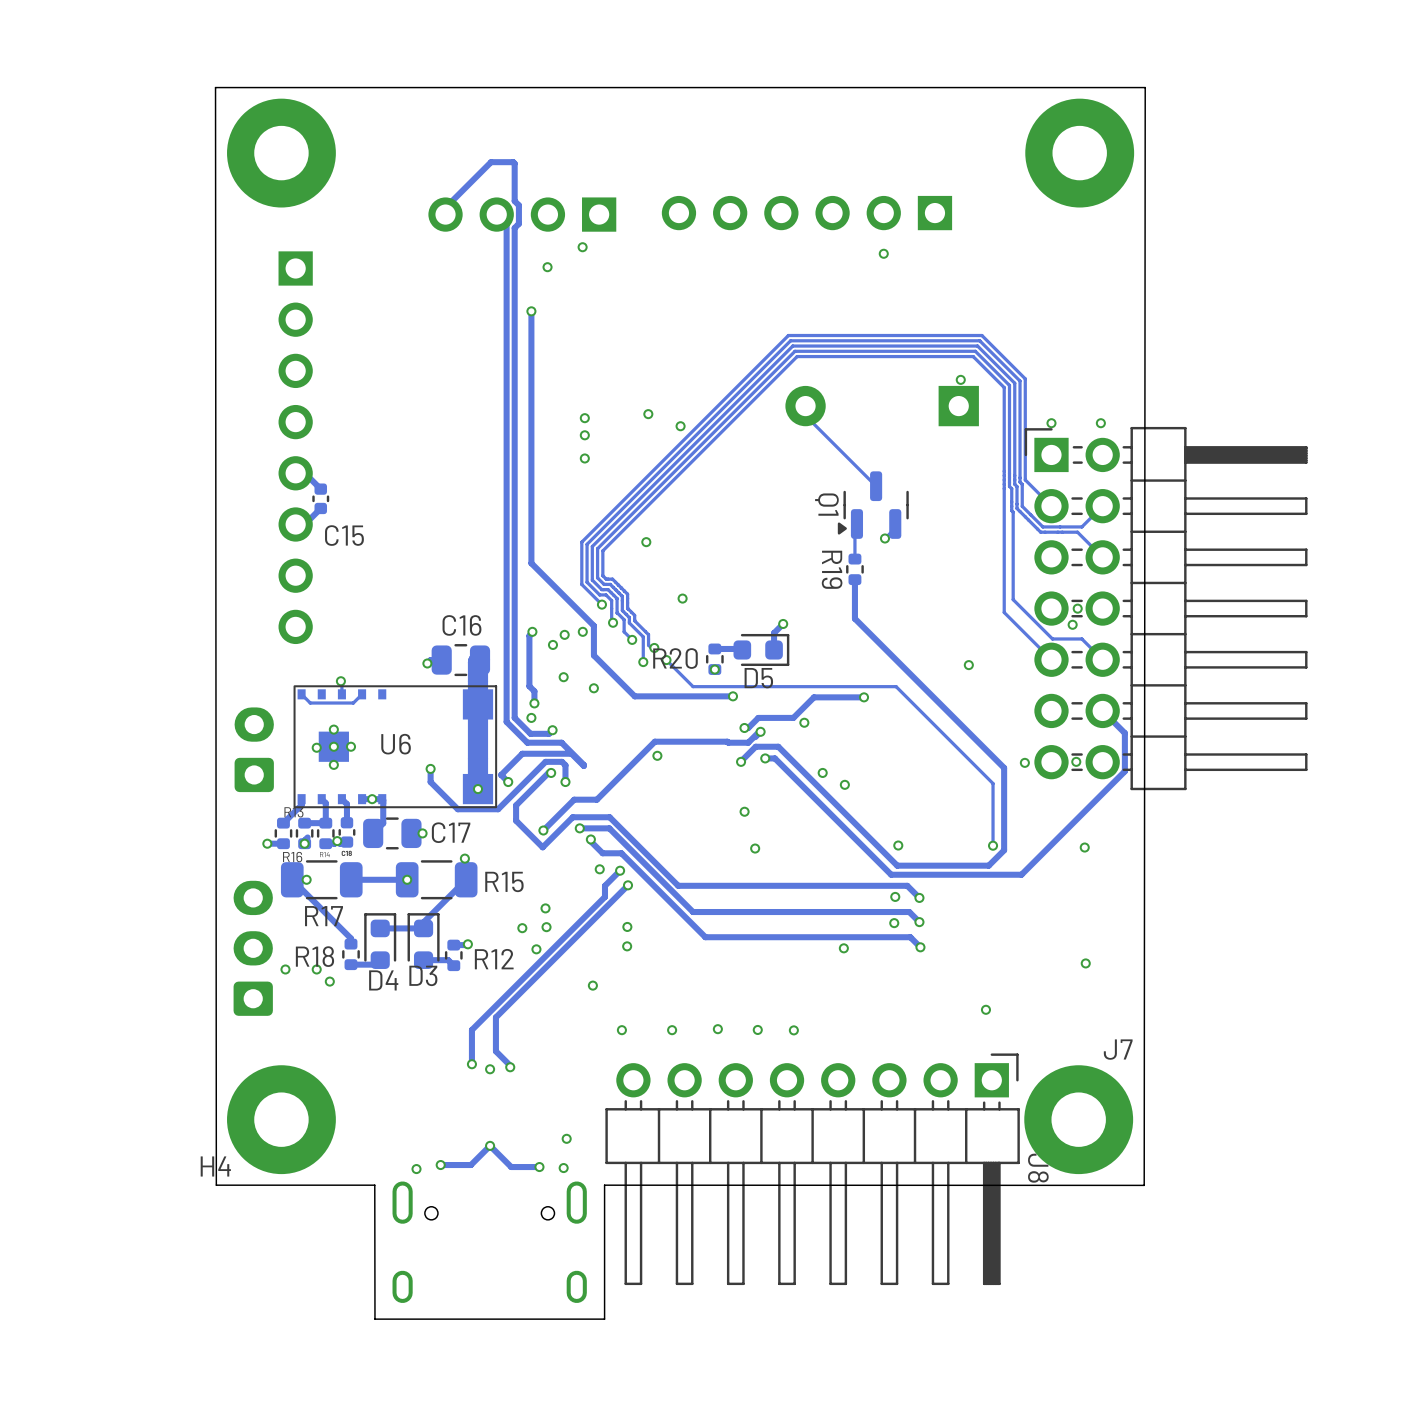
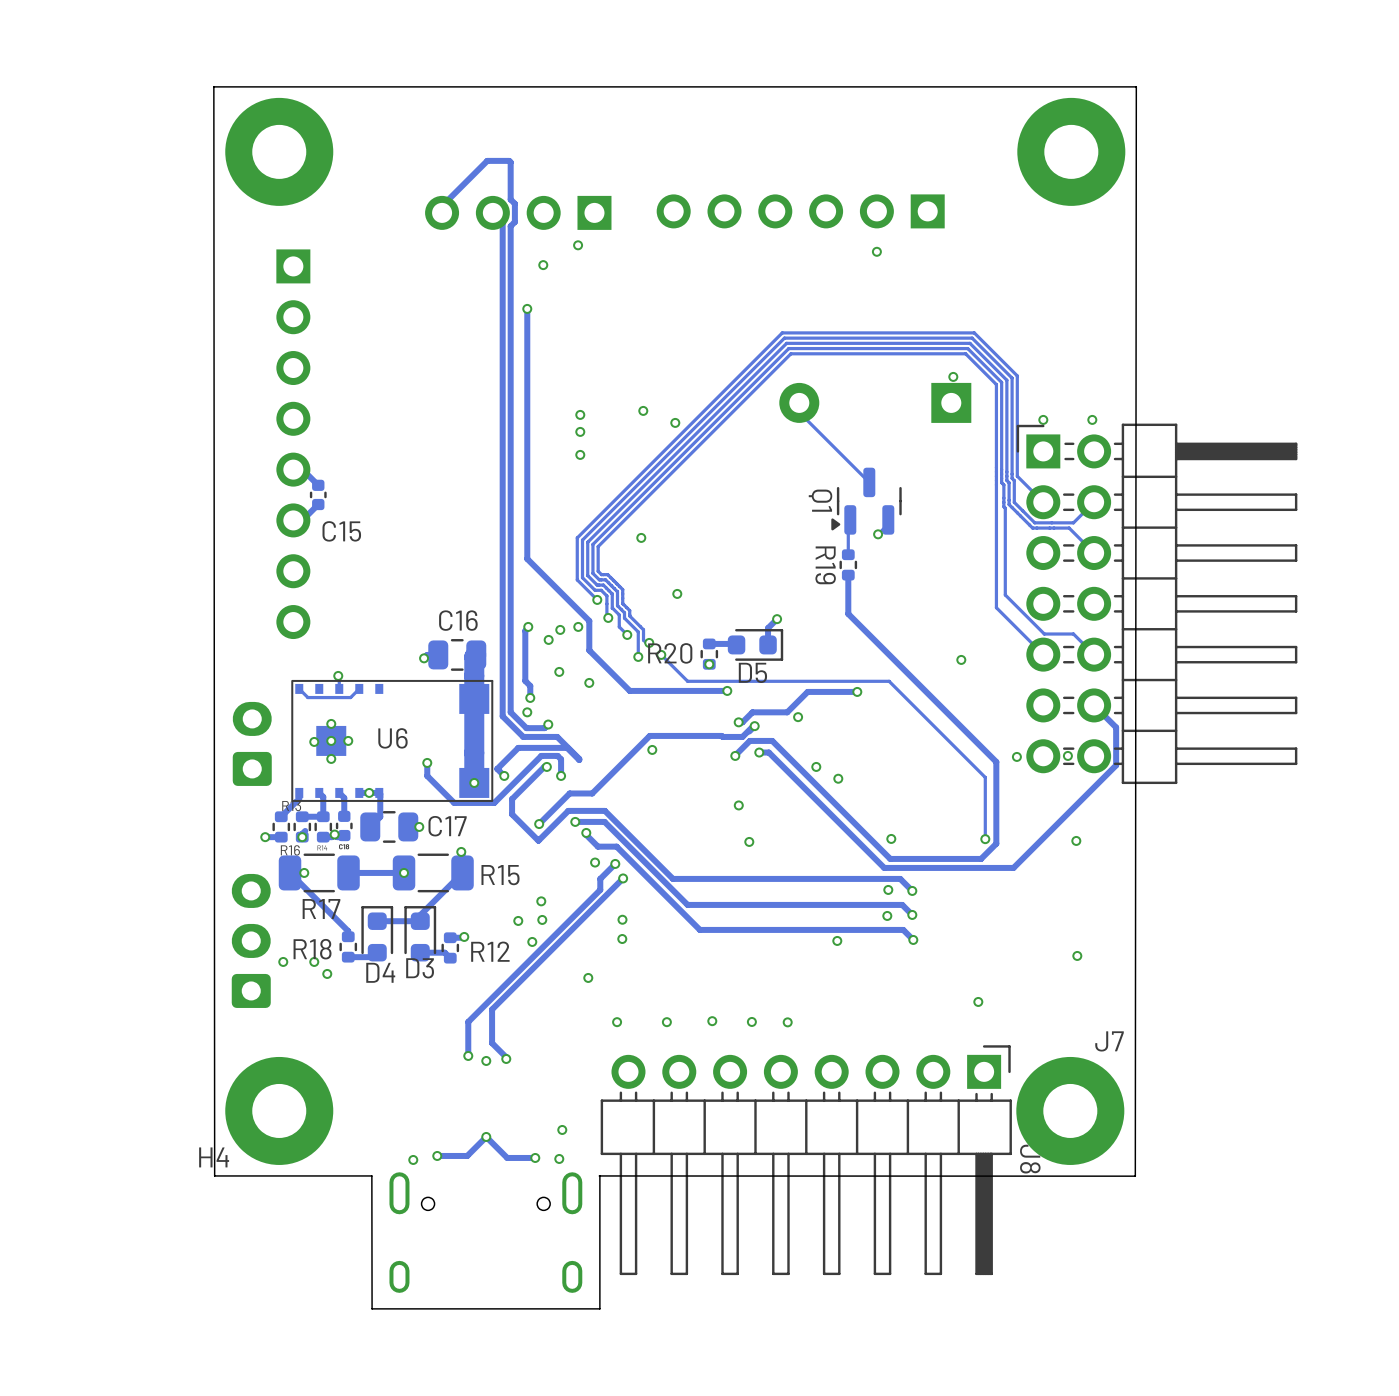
via: (1077, 608) -> none
via: (1072, 624) -> none

